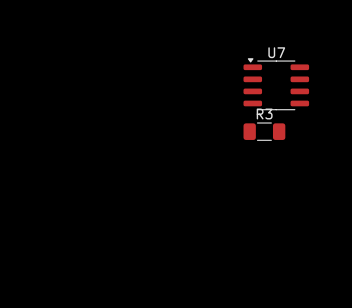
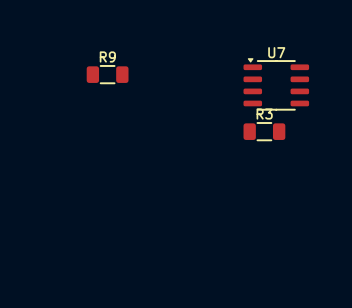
R9: none -> (107, 74)

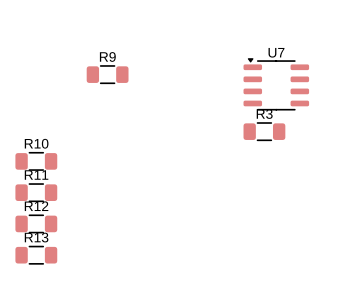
R10: none -> (36, 161)
R11: none -> (36, 192)
R12: none -> (36, 223)
R13: none -> (36, 255)

